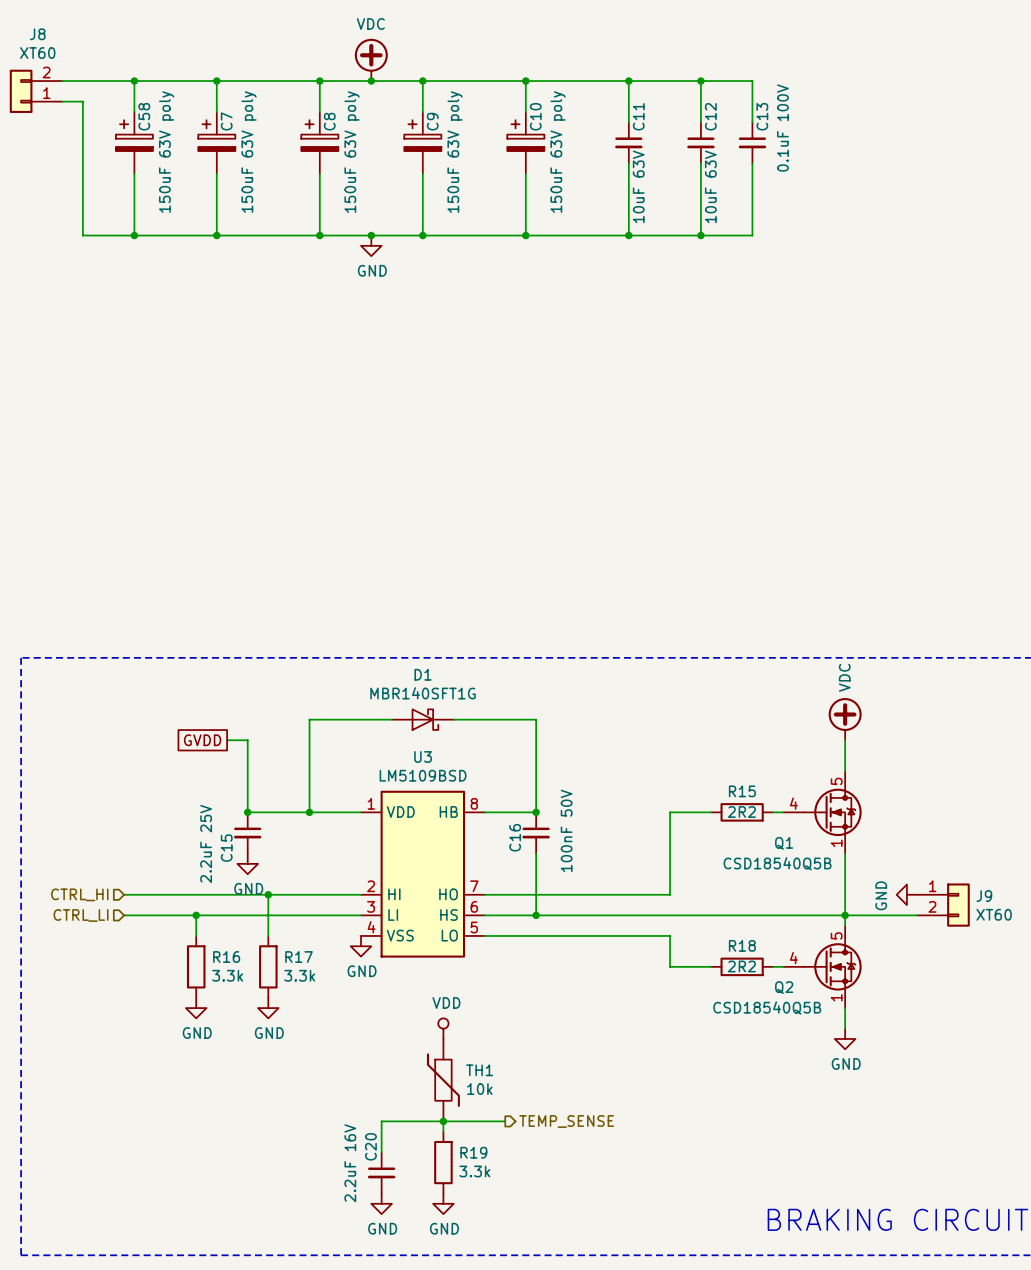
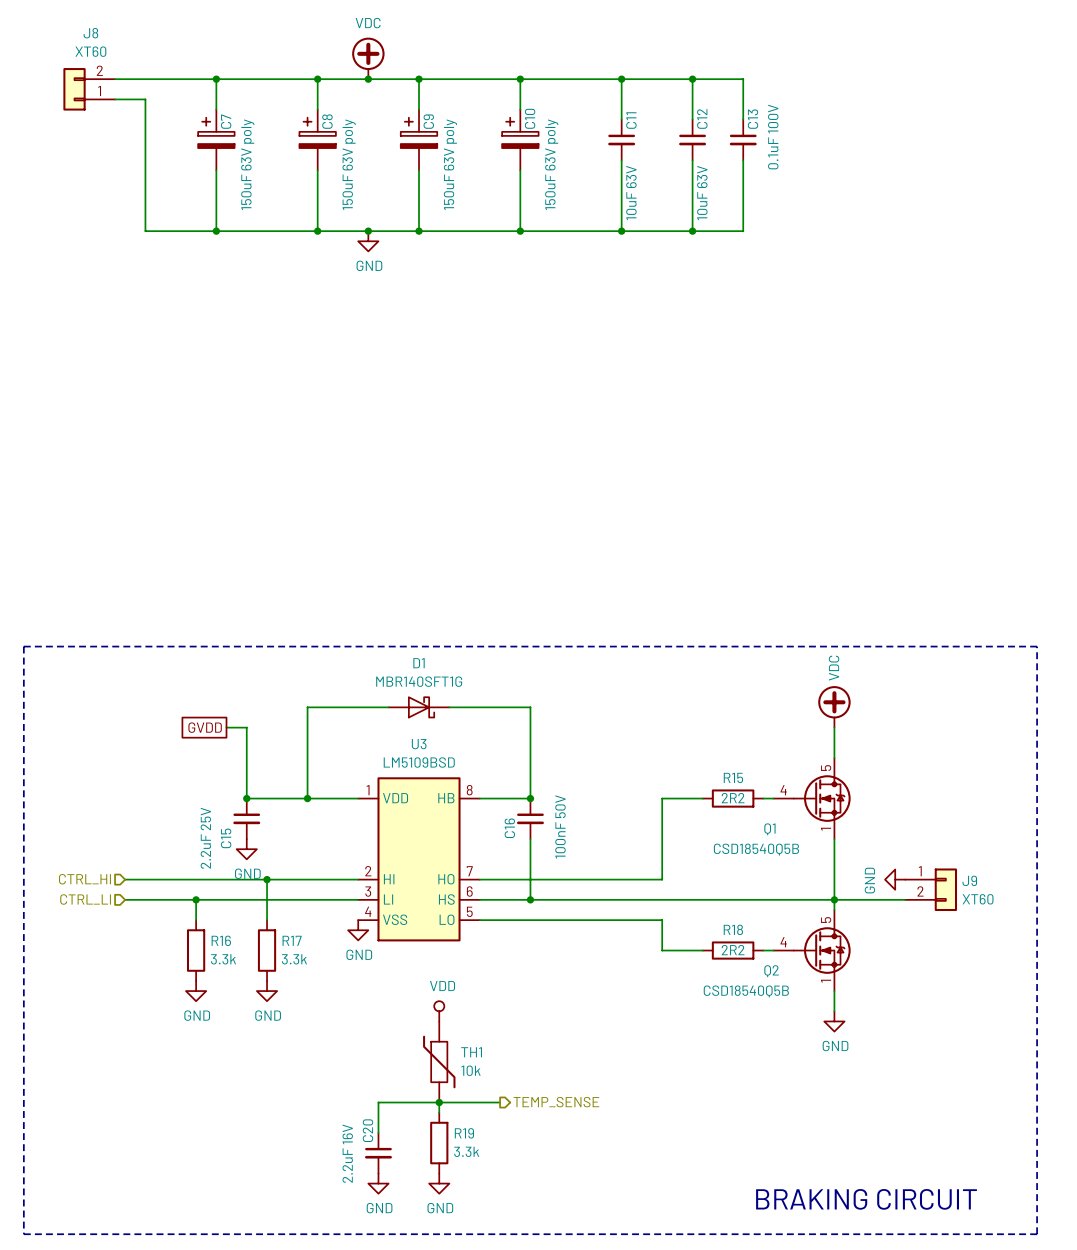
wire: (134, 81) (134, 111) -> none
junction: (134, 81) -> none
J8 position: (36, 91) -> (89, 89)
wire: (62, 101) (82, 101) (82, 235) (144, 235) -> (115, 99) (145, 99) (145, 231)
C58: 150uF 63V poly (134, 142) -> none
wire: (134, 173) (134, 235) -> none
junction: (134, 235) -> none

